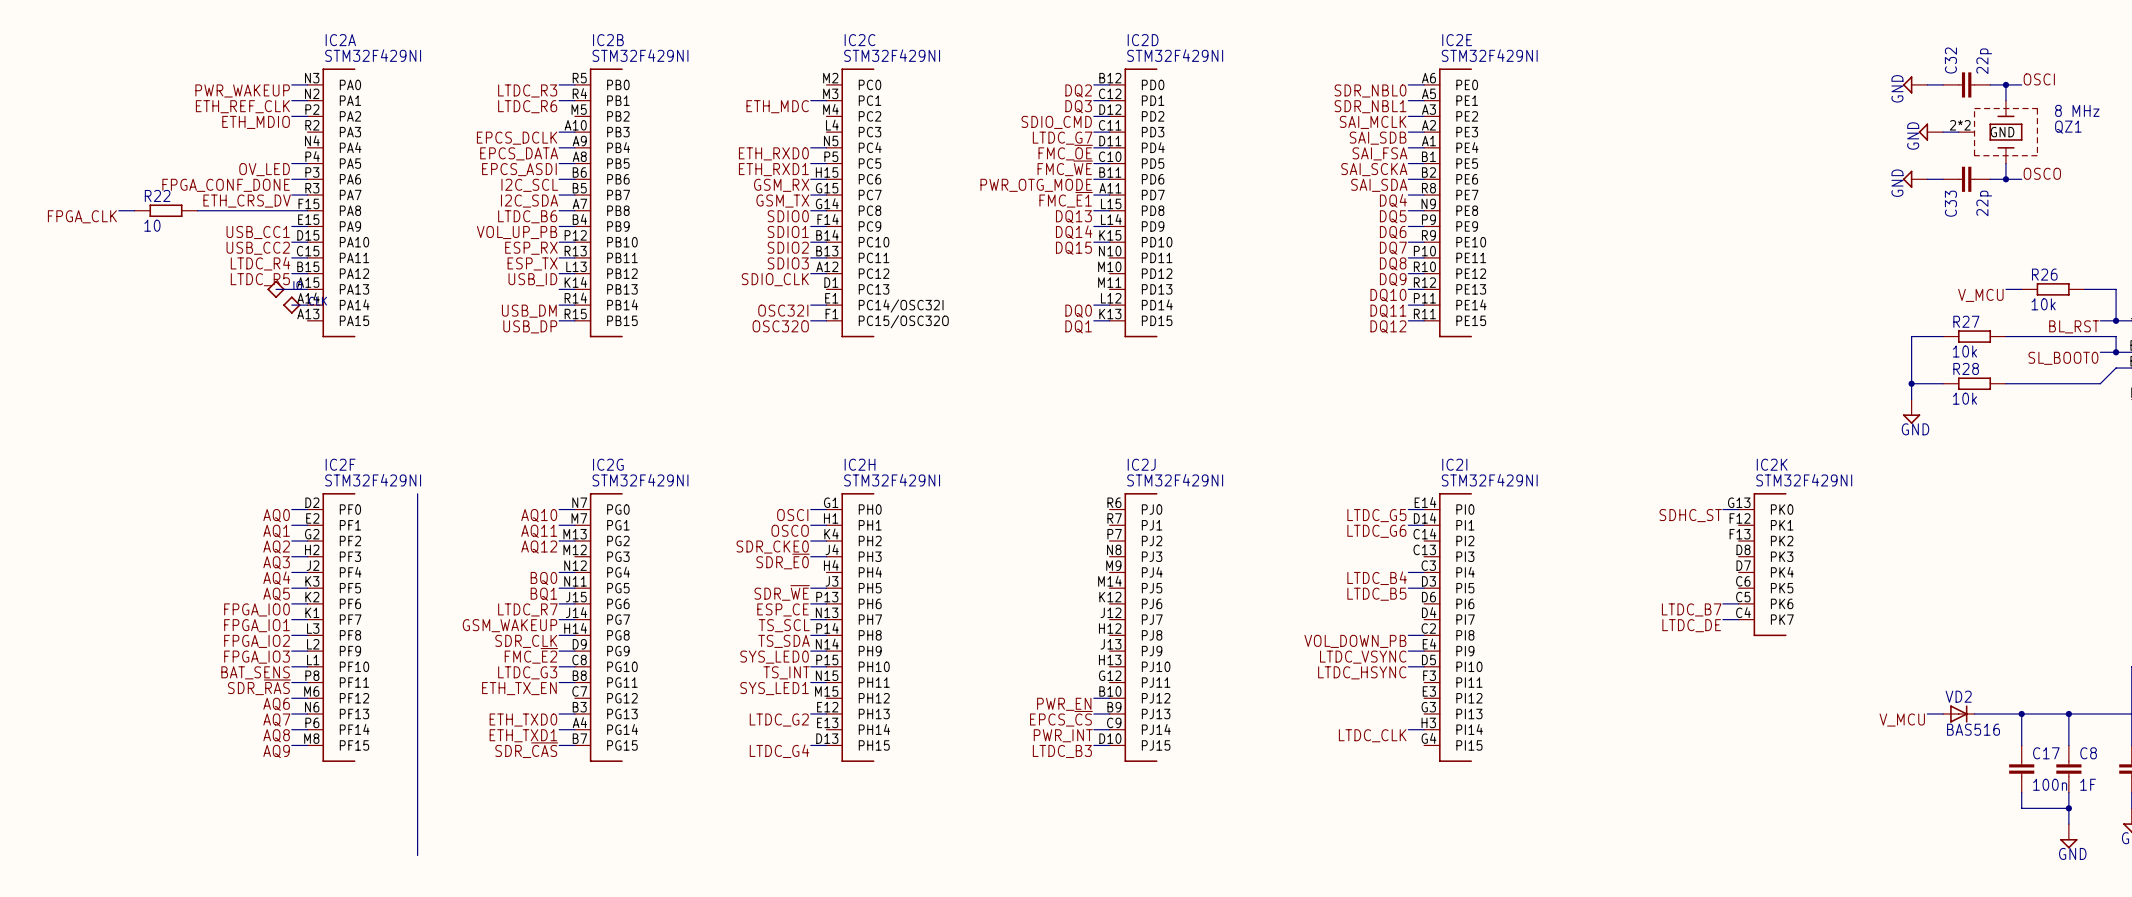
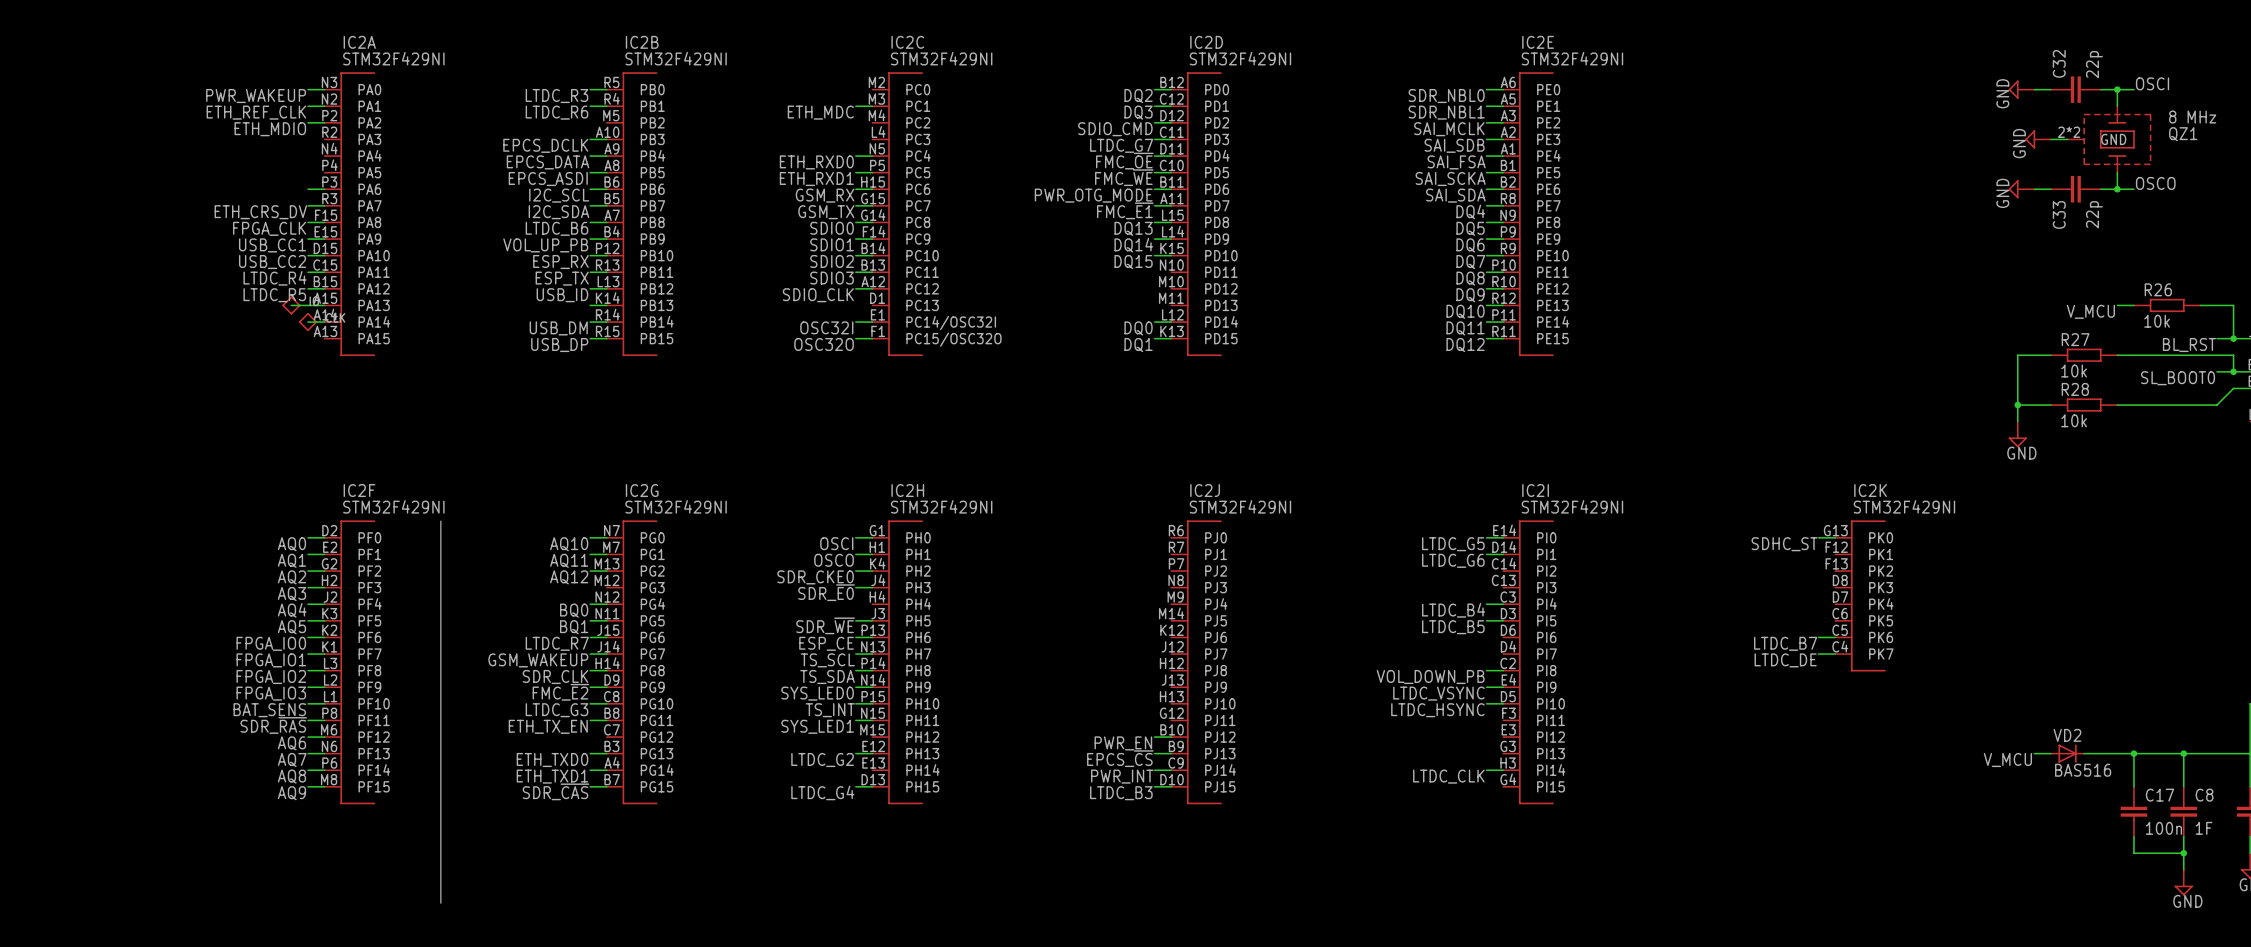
wire: (291, 163) (307, 163) -> none
label: OV_LED (264, 169) -> none
label: FPGA_CONF_DONE (226, 185) -> none
wire: (118, 210) (134, 210) -> none
R22: 10 (165, 210) -> none
wire: (197, 210) (291, 210) -> none
label: FPGA_CLK (82, 216) -> none
label: none -> FPGA_CLK (269, 228)

